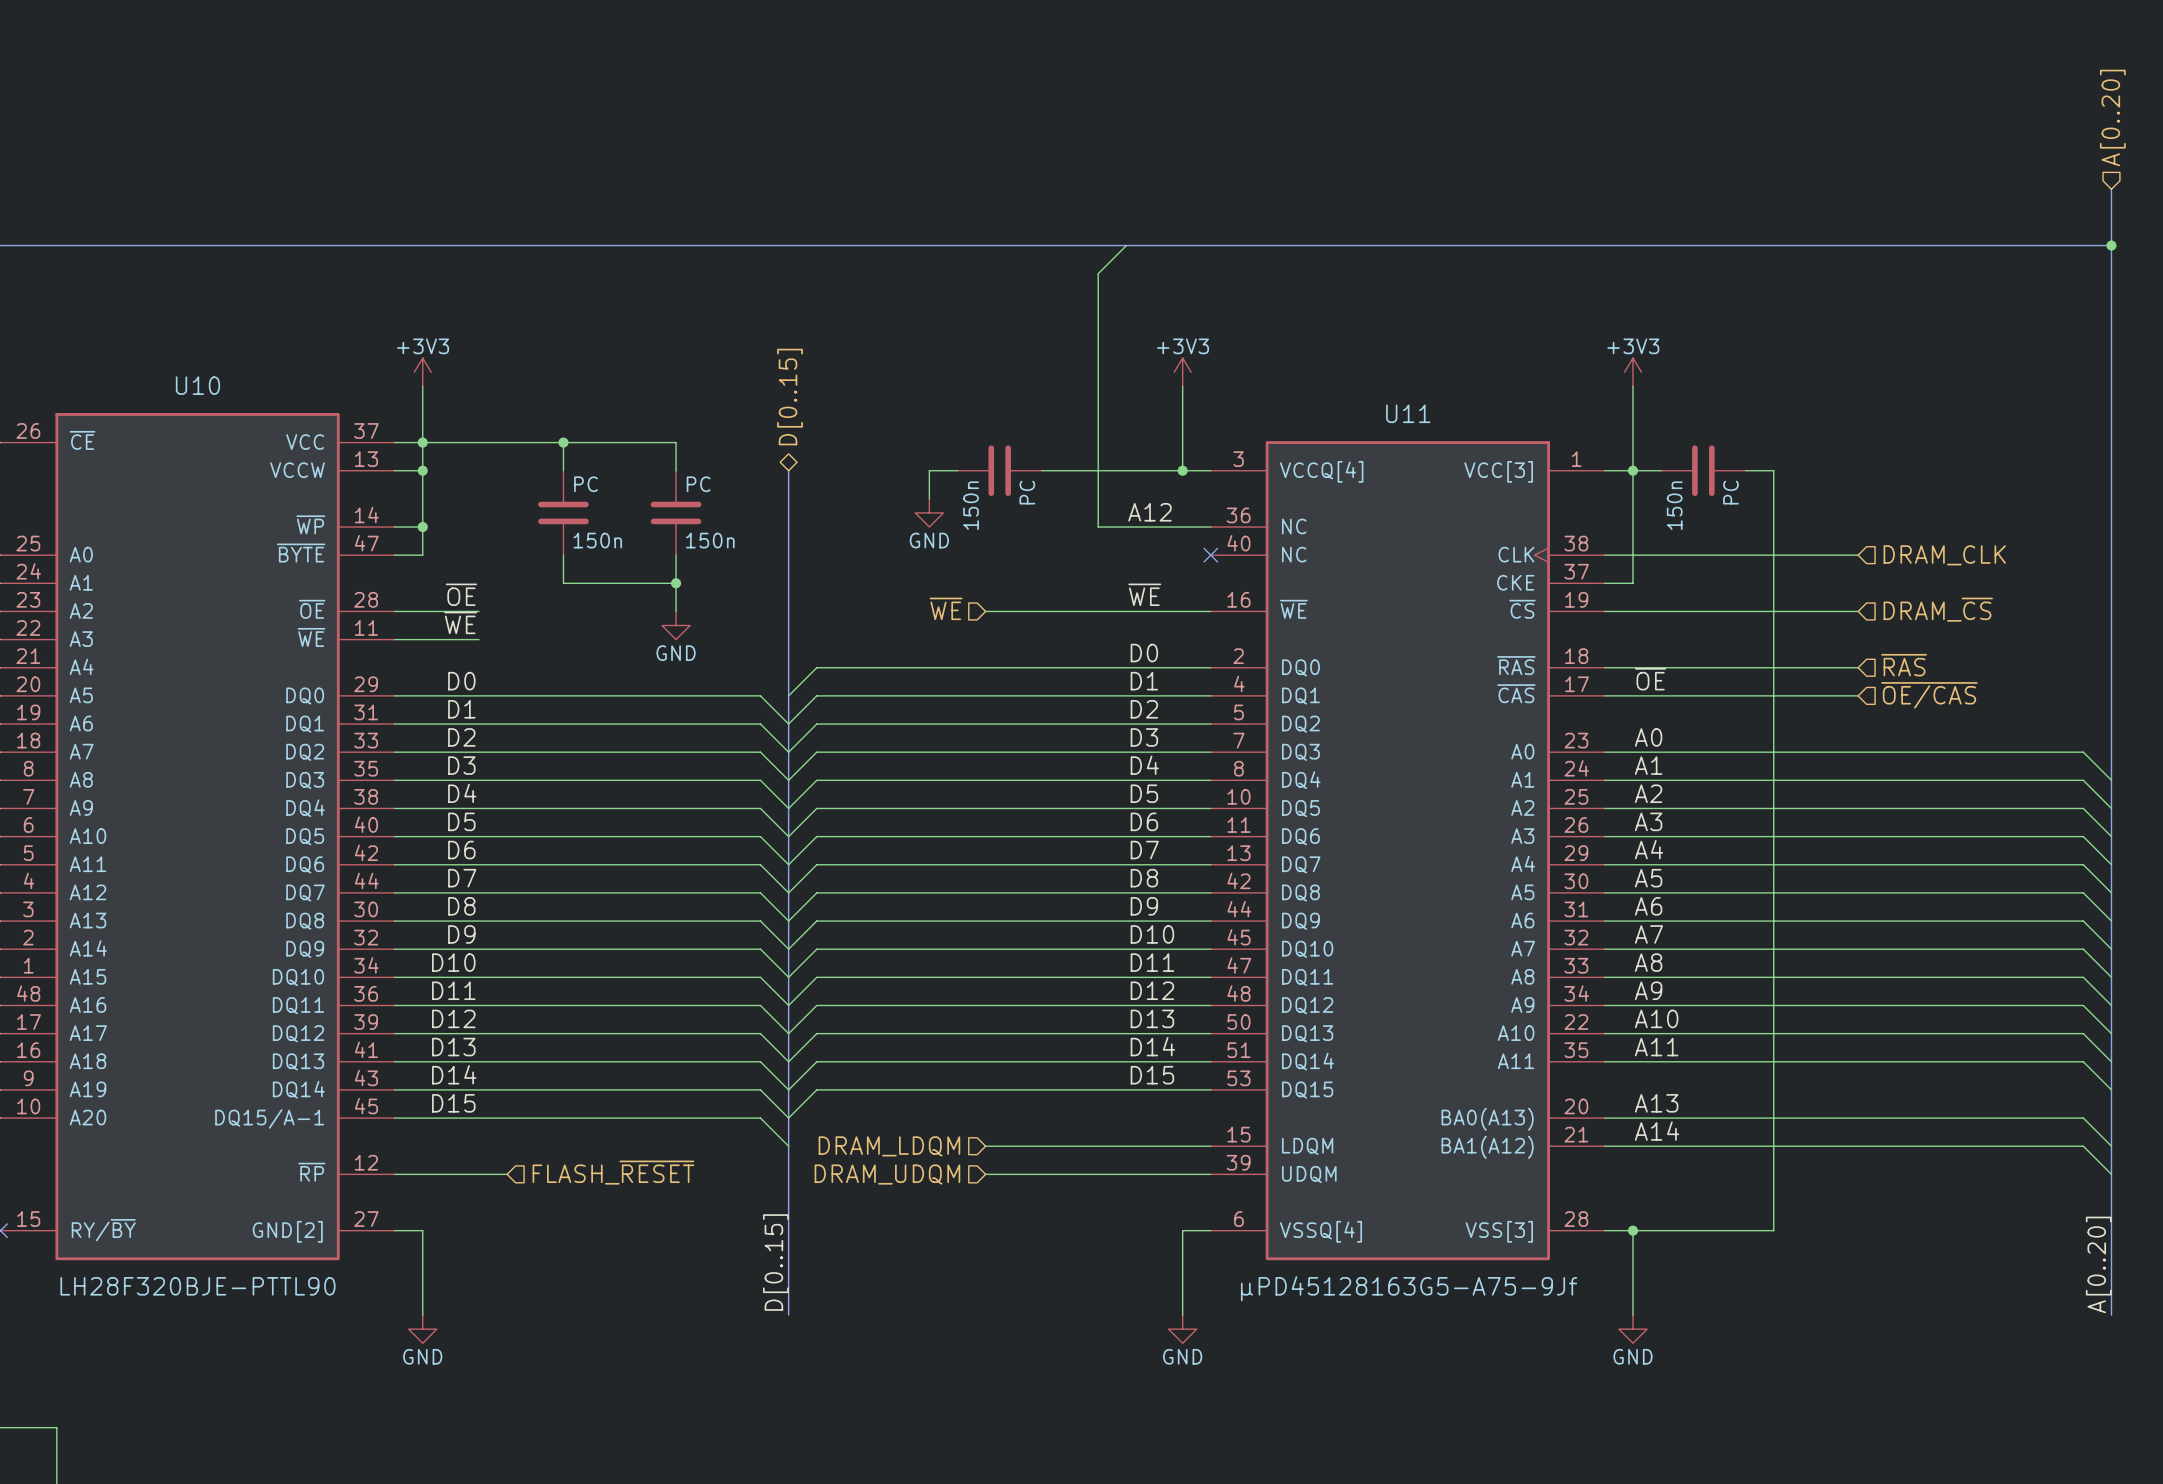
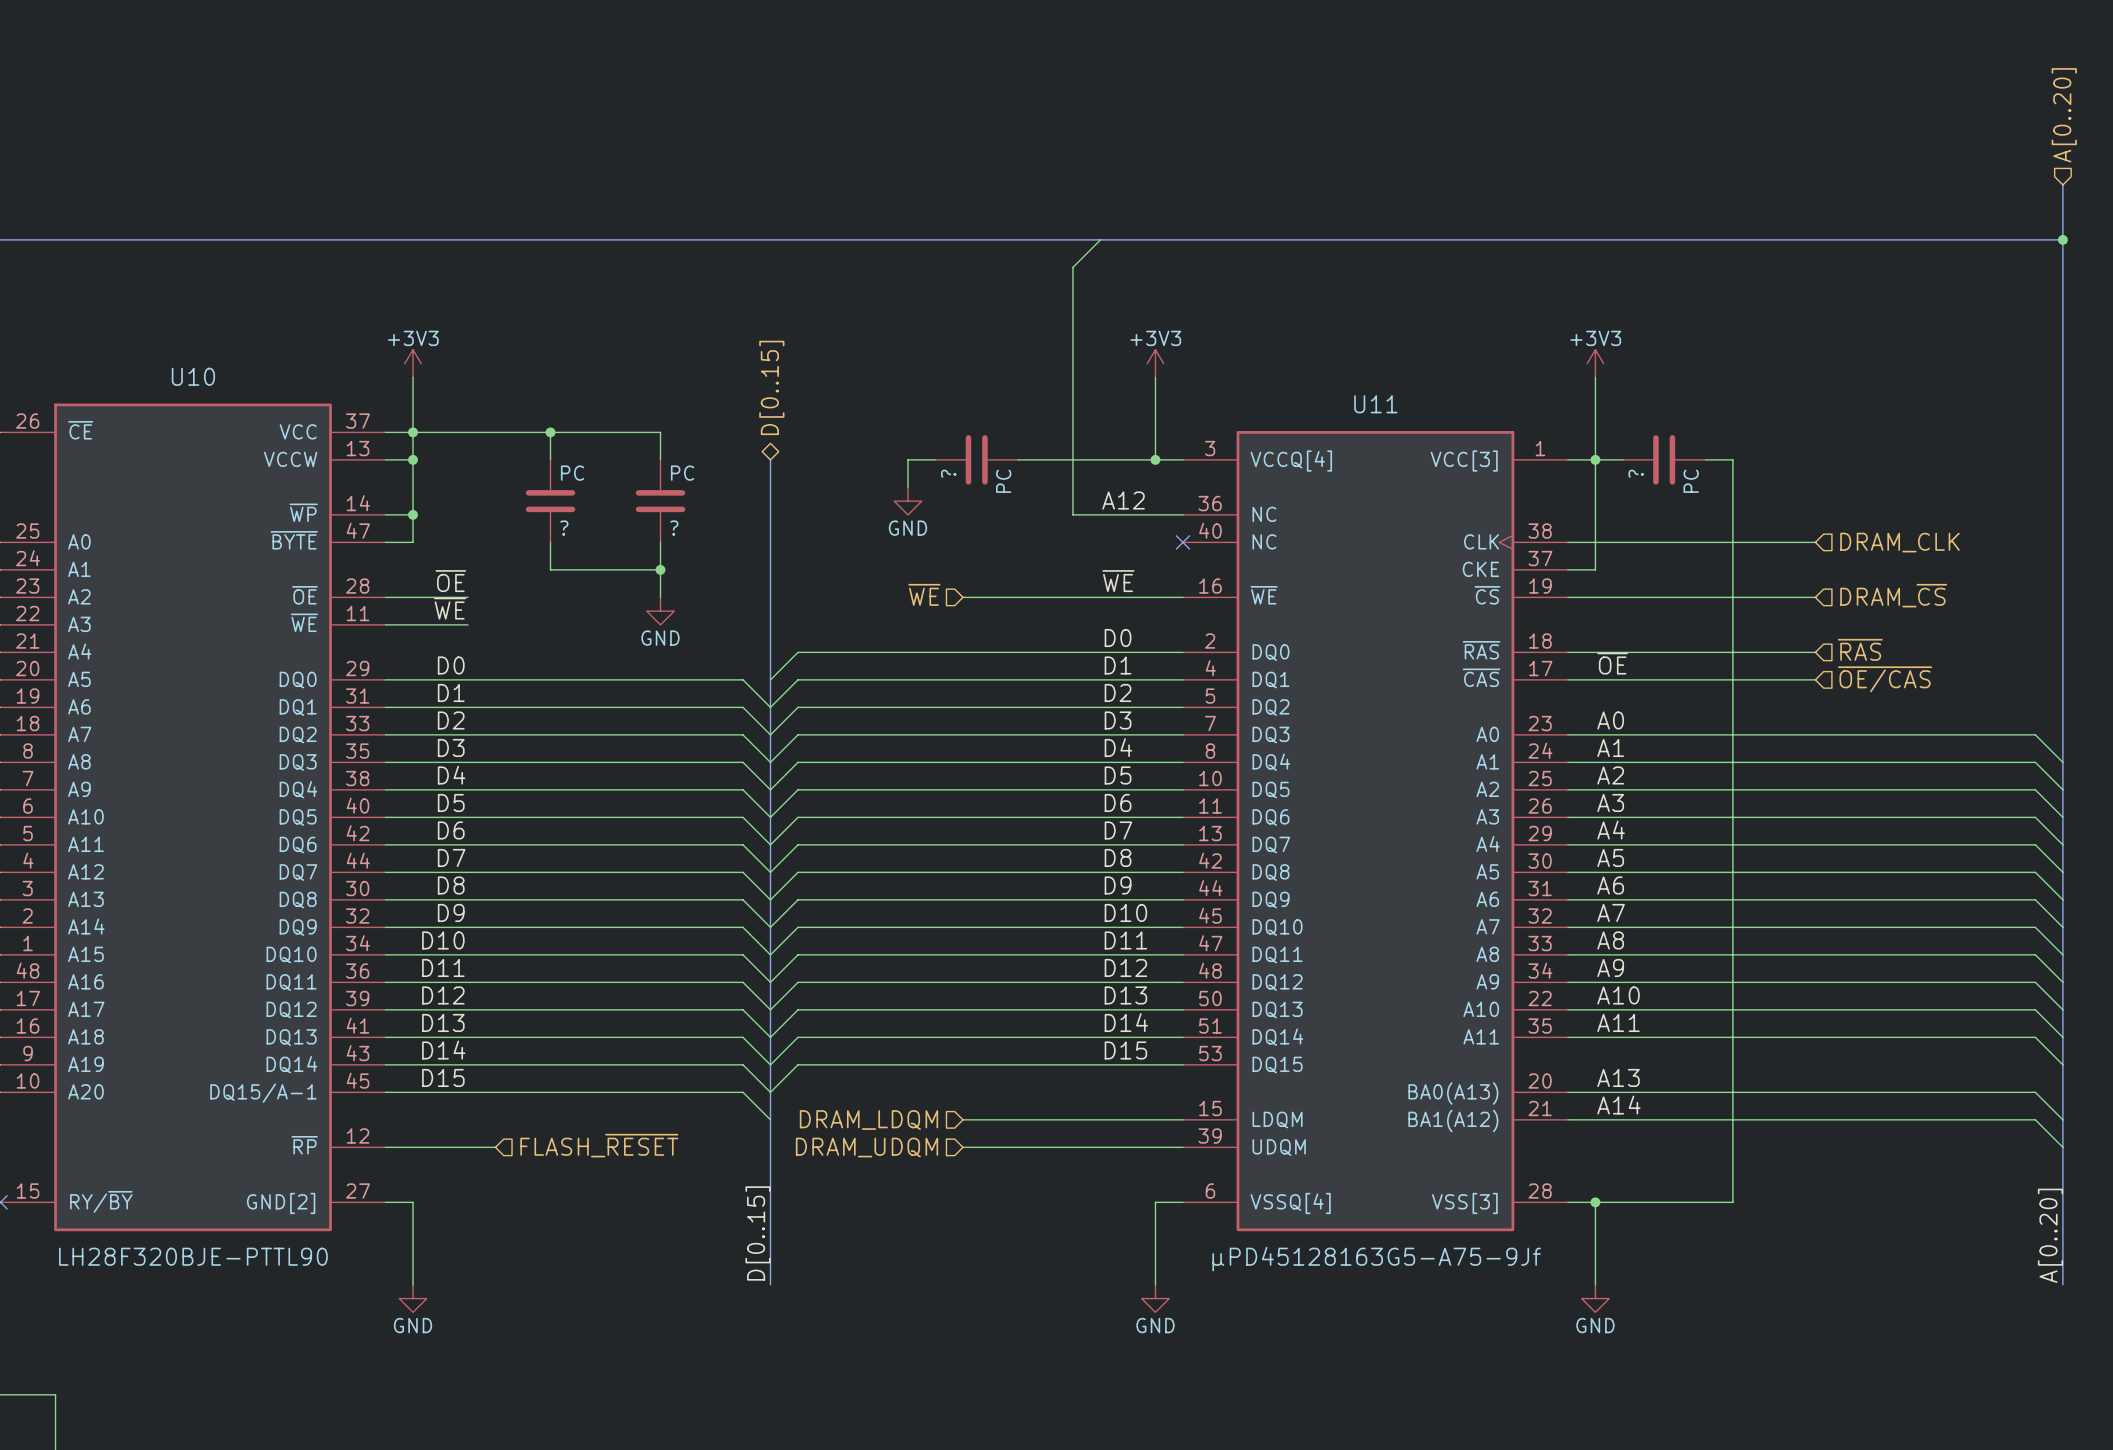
PC value: 150n (971, 505) -> ? (948, 473)
PC value: 150n (1674, 505) -> ? (1636, 473)
PC value: 150n (597, 540) -> ? (564, 528)
PC value: 150n (710, 540) -> ? (674, 528)

